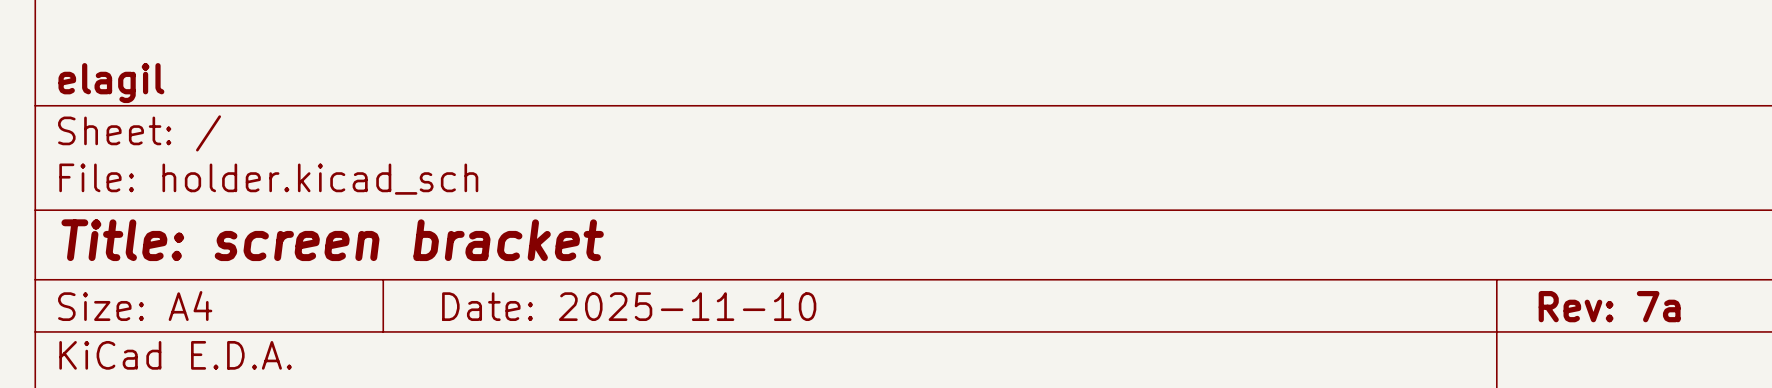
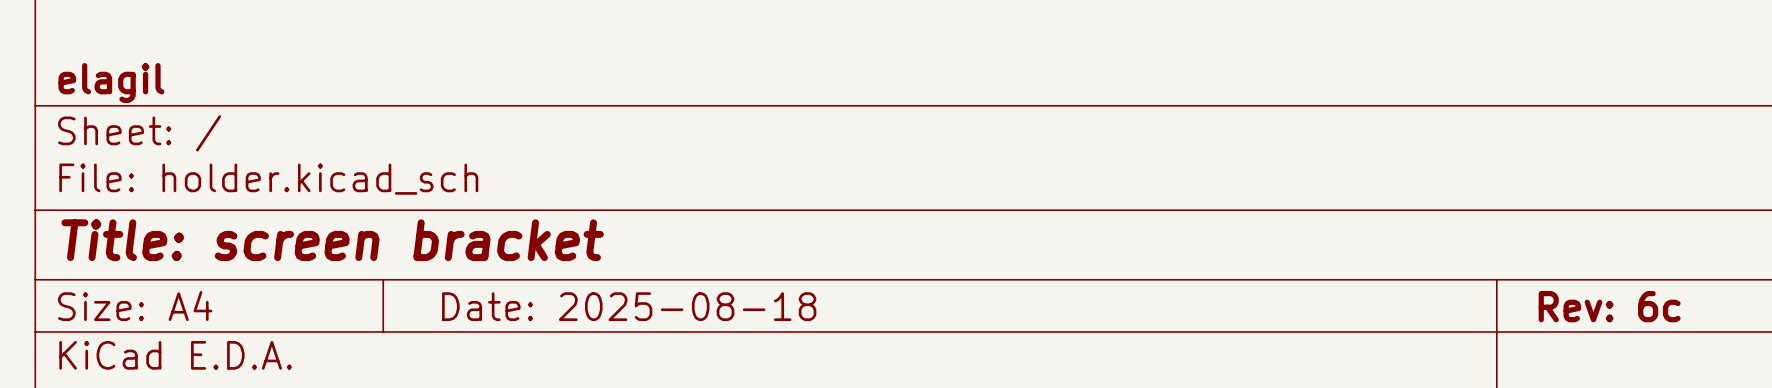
title block: Date: 2025-11-10 (629, 306) -> Date: 2025-08-18 (629, 306)
title block: Rev: 7a (1609, 306) -> Rev: 6c (1609, 306)

